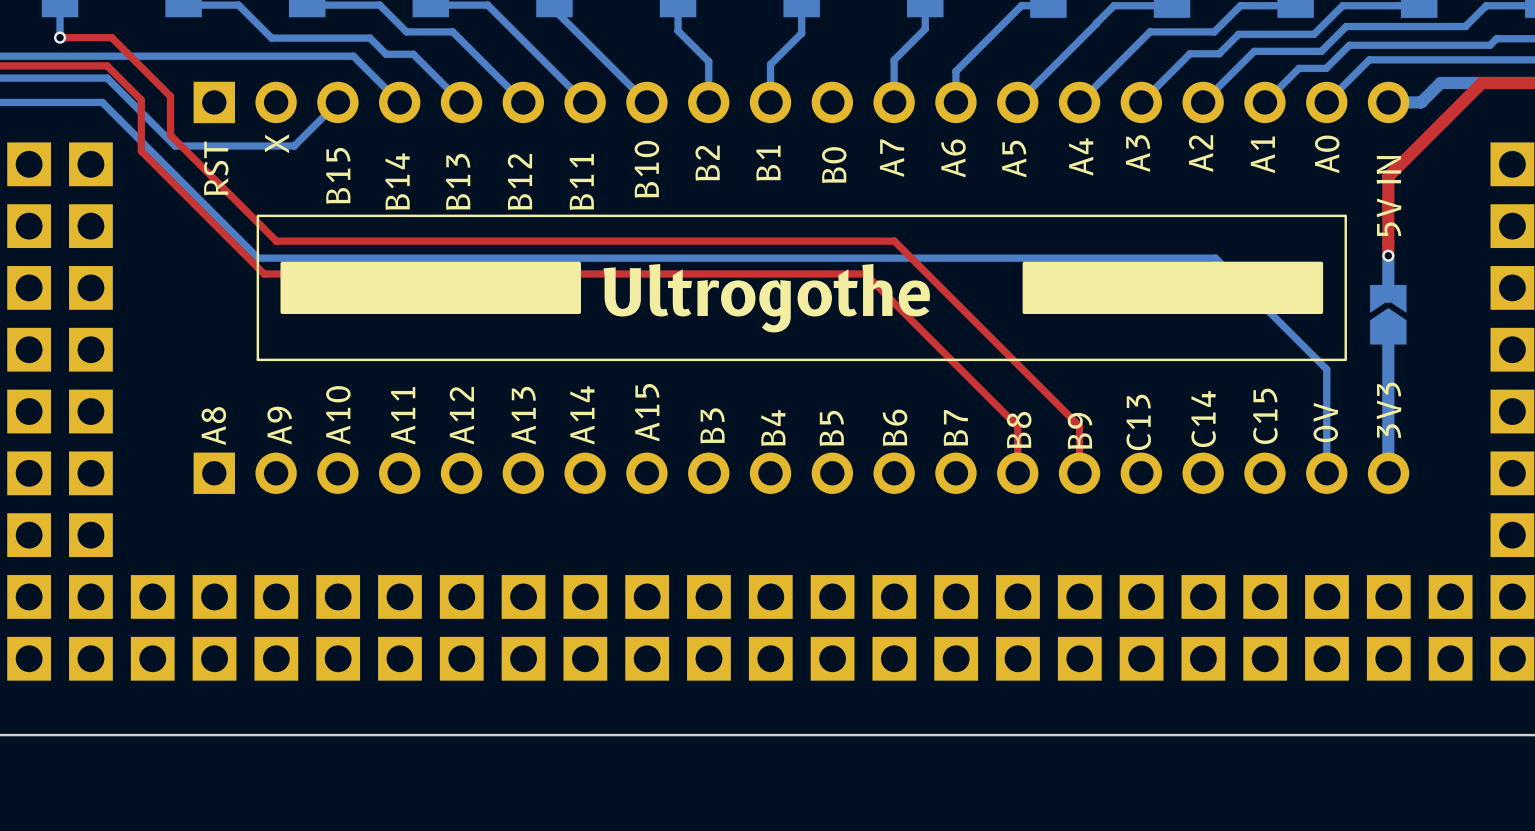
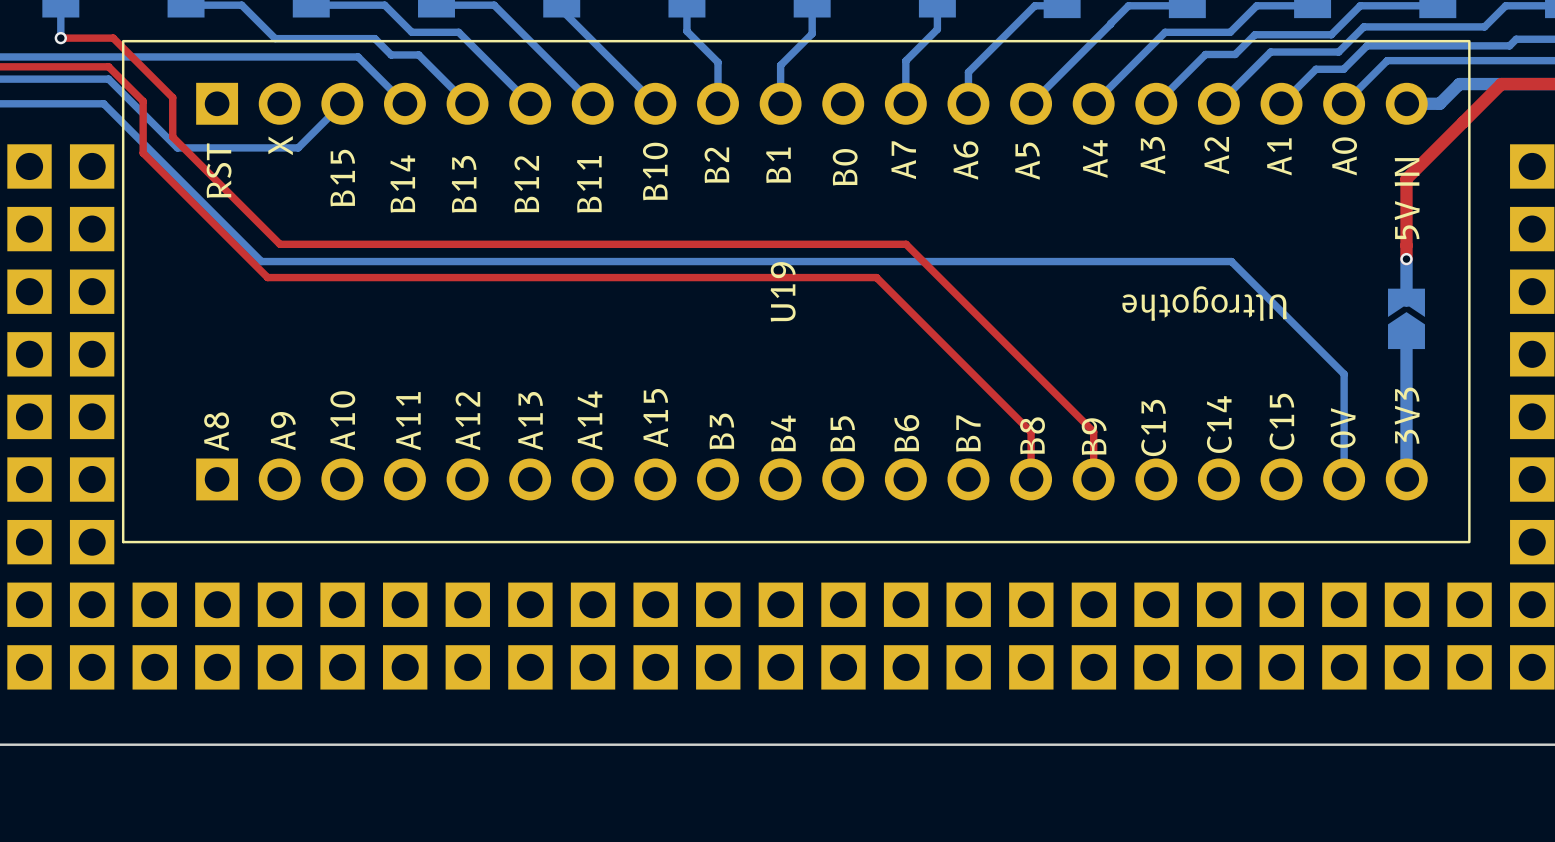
U19: none -> (796, 291)
part: (801, 287) -> none

